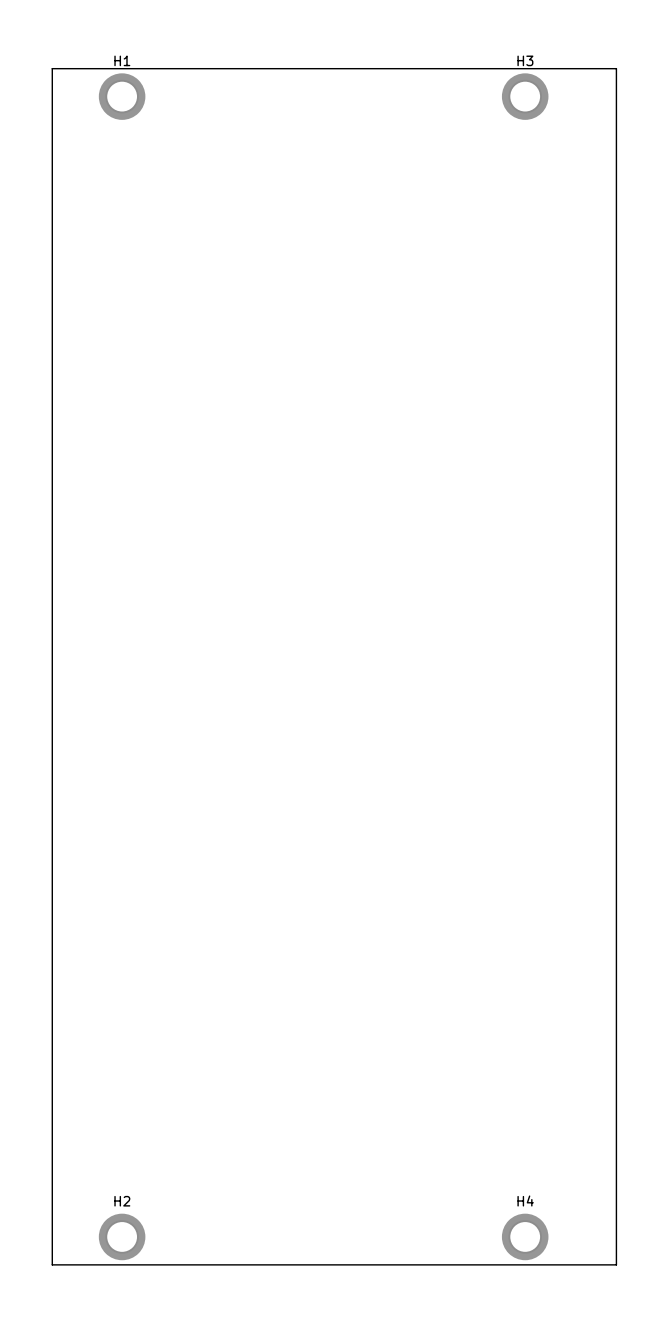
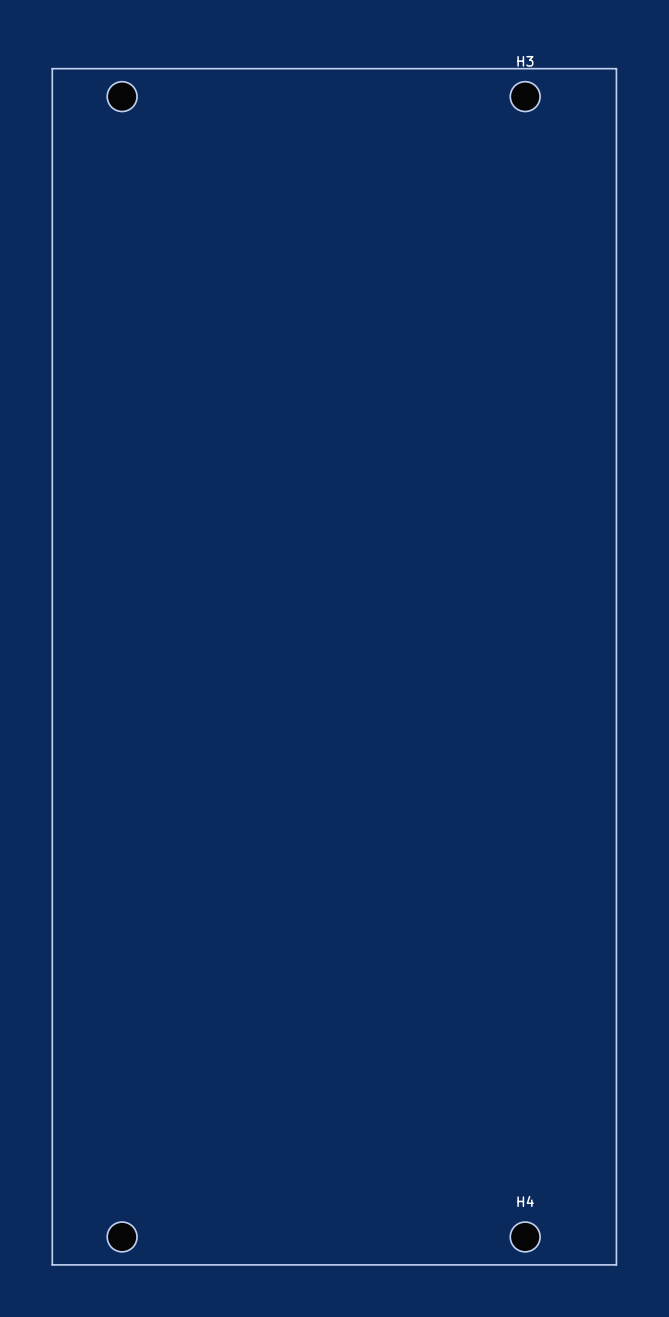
H3 footprint: [501, 73, 549, 120] -> [510, 81, 541, 112]
H1: (122, 96) -> none
part: none -> (122, 96)
H4 footprint: [501, 1213, 549, 1261] -> [510, 1222, 541, 1252]
H2: (122, 1236) -> none
part: none -> (122, 1236)

